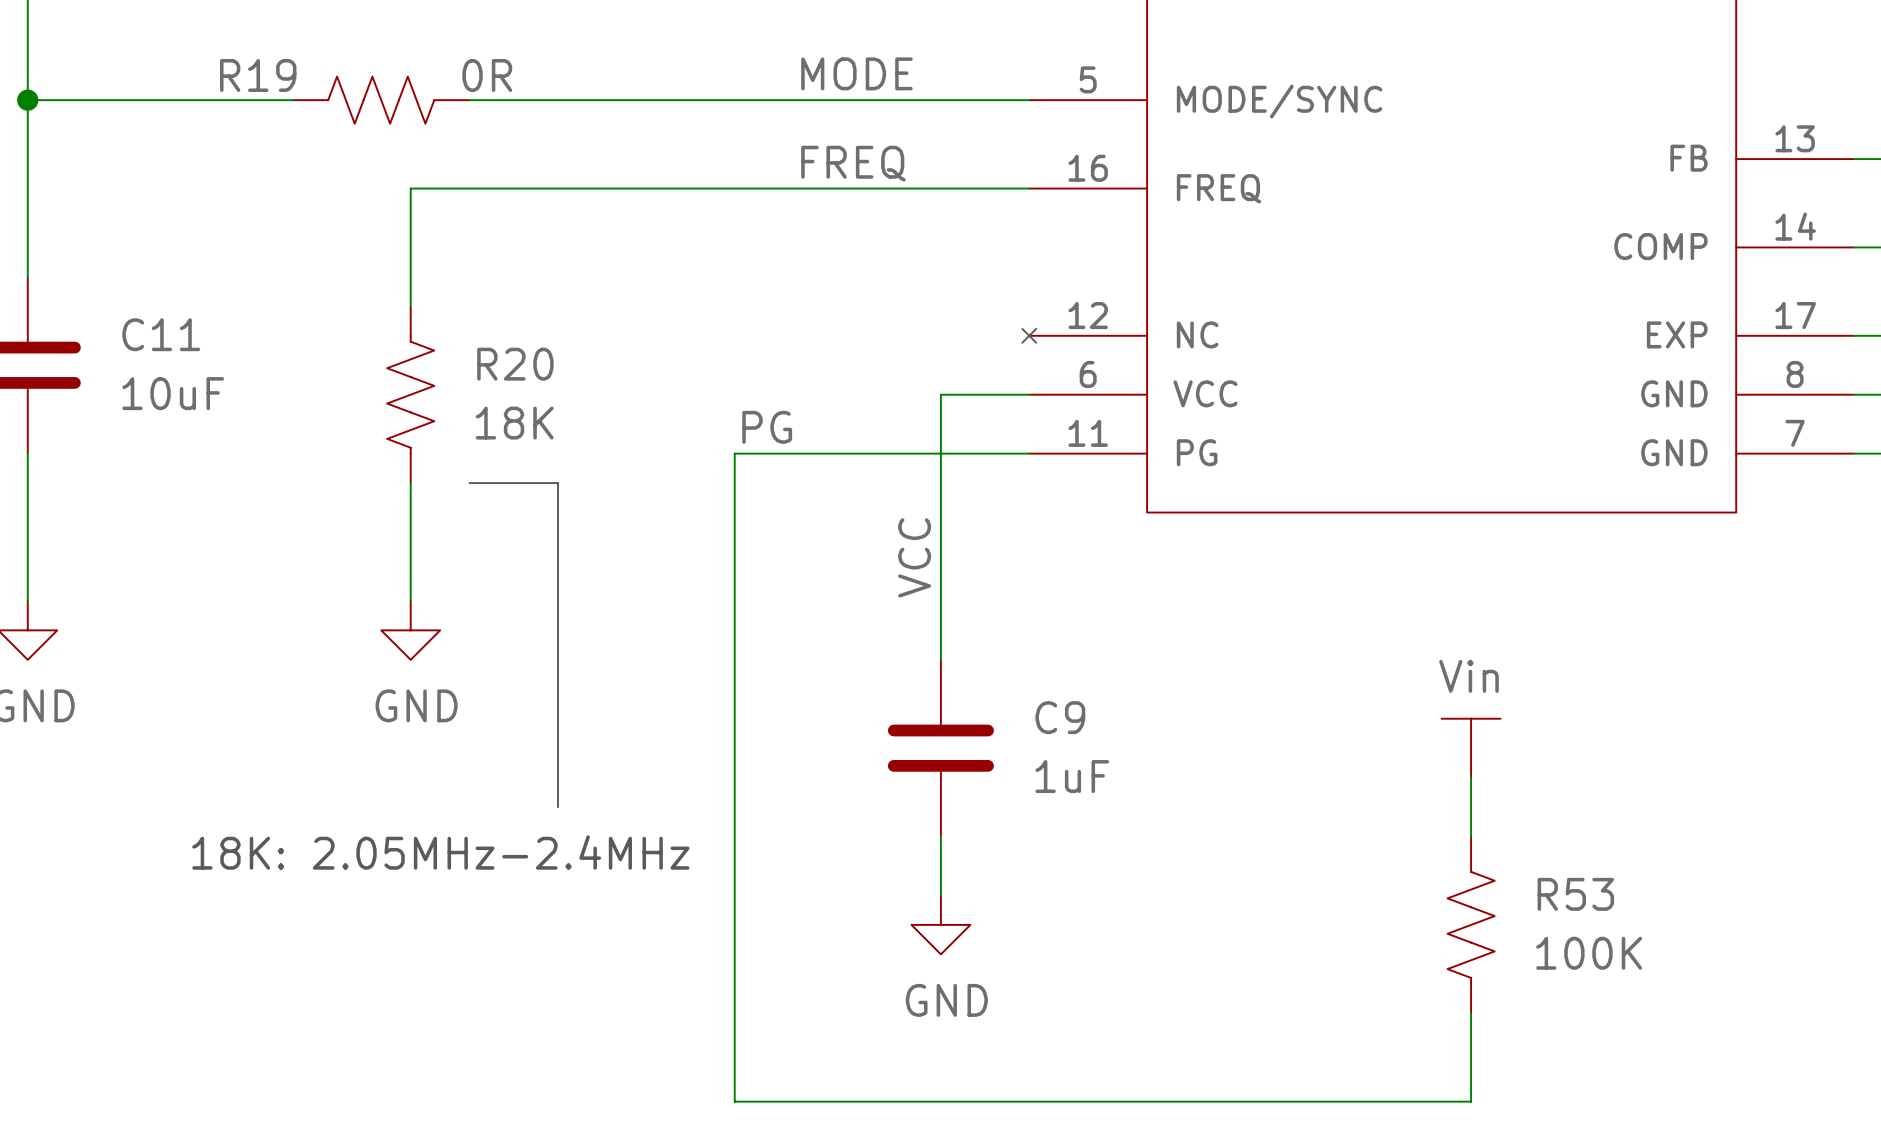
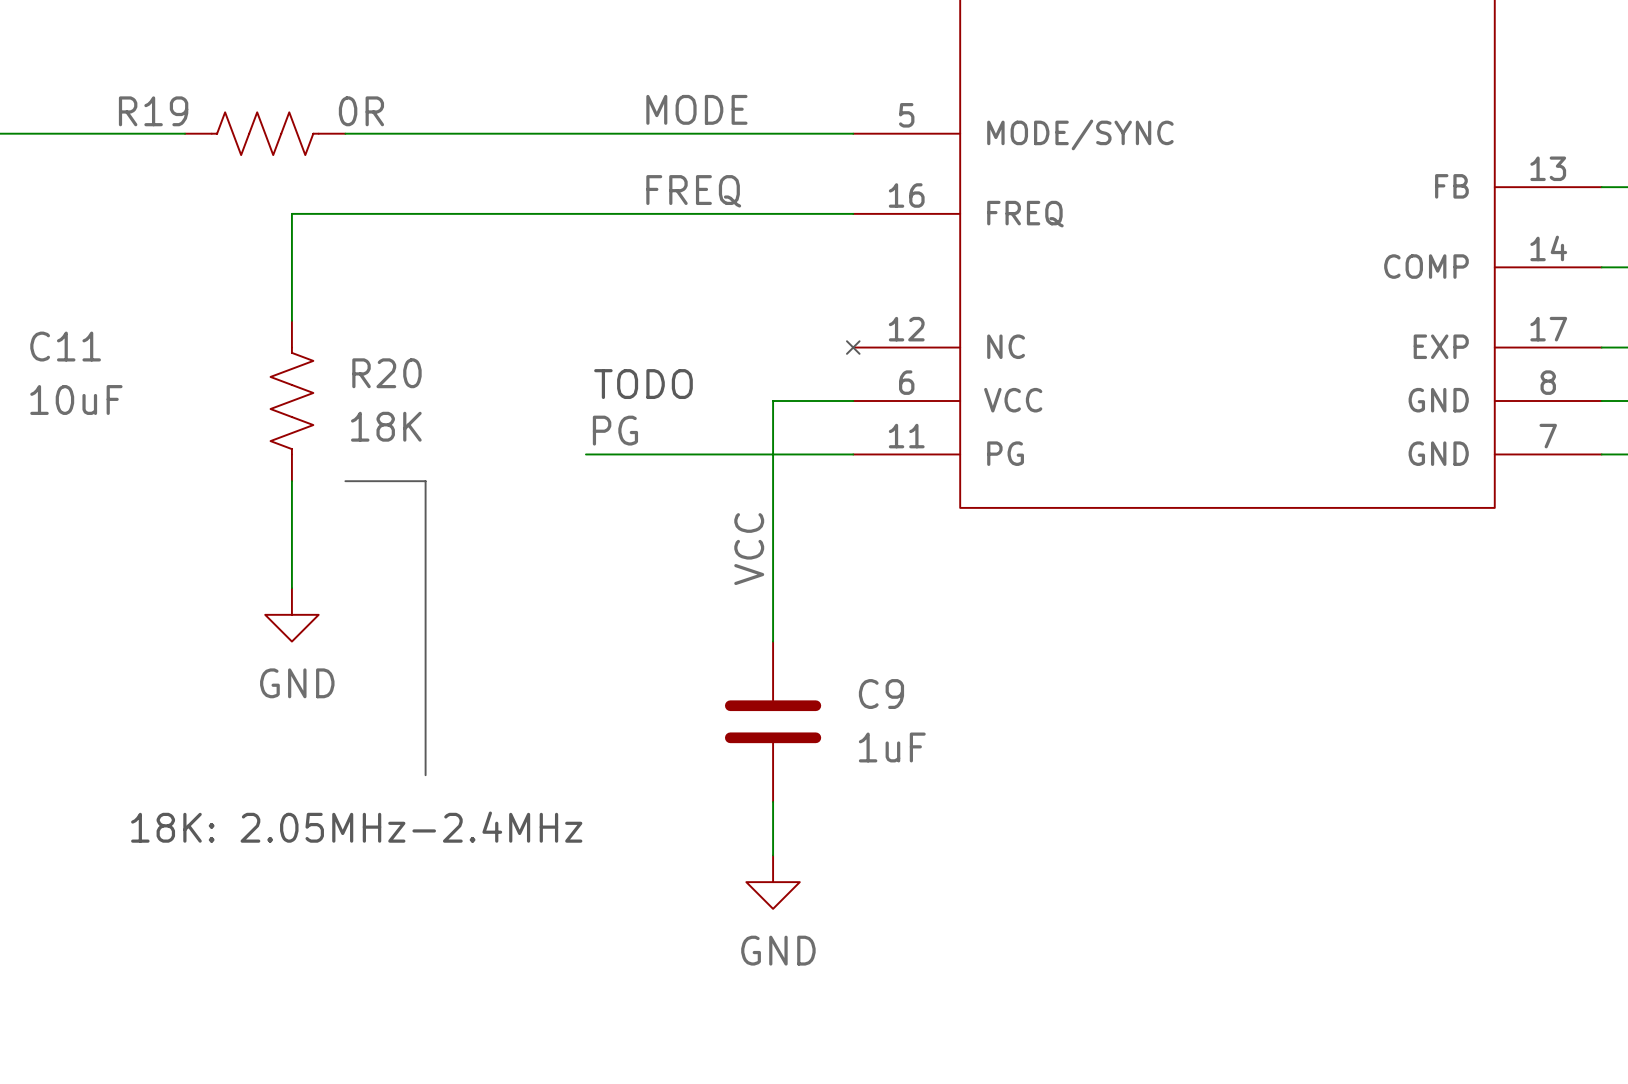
text: none -> TODO (643, 384)
wire: (734, 453) (734, 1101) (1471, 1101) (1471, 1013) -> none
power symbol: Vin (1471, 748) -> none
wire: (1471, 777) (1471, 836) -> none
text position: 18K: 2.05MHz-2.4MHz (440, 852) -> 18K: 2.05MHz-2.4MHz (356, 827)
R53: 100K (1471, 924) -> none

